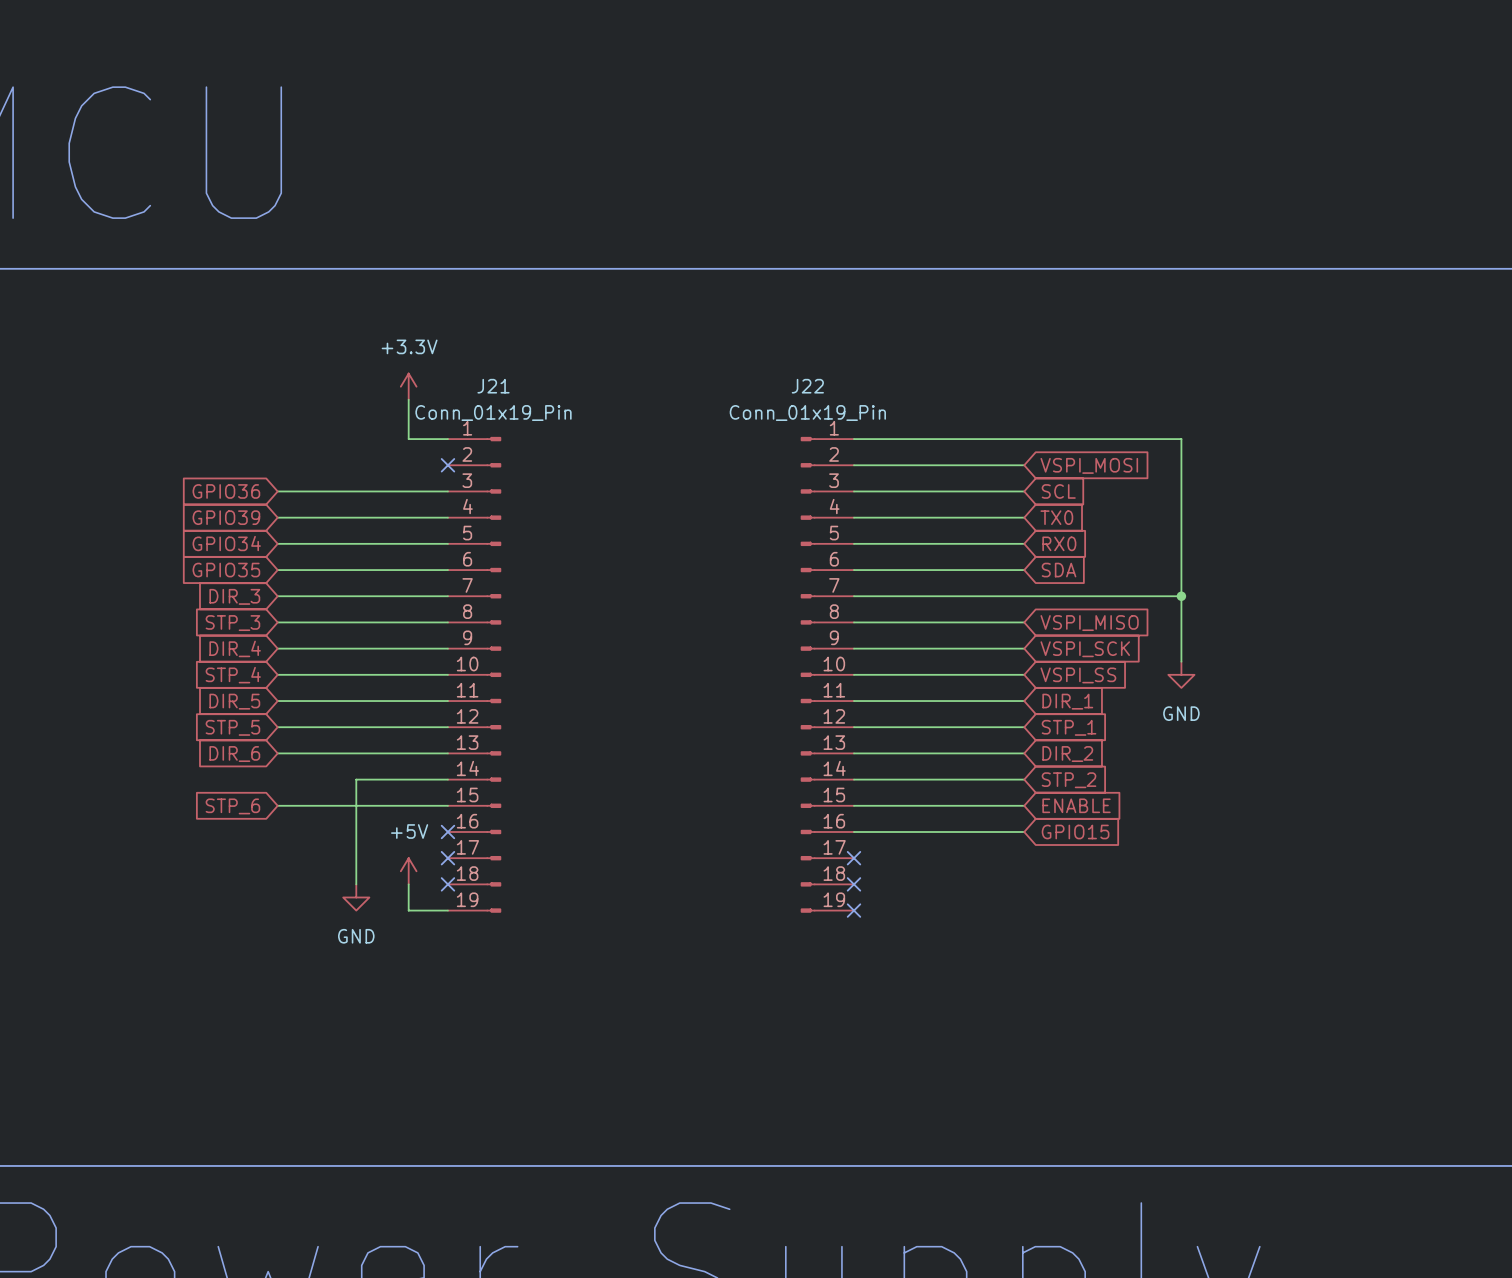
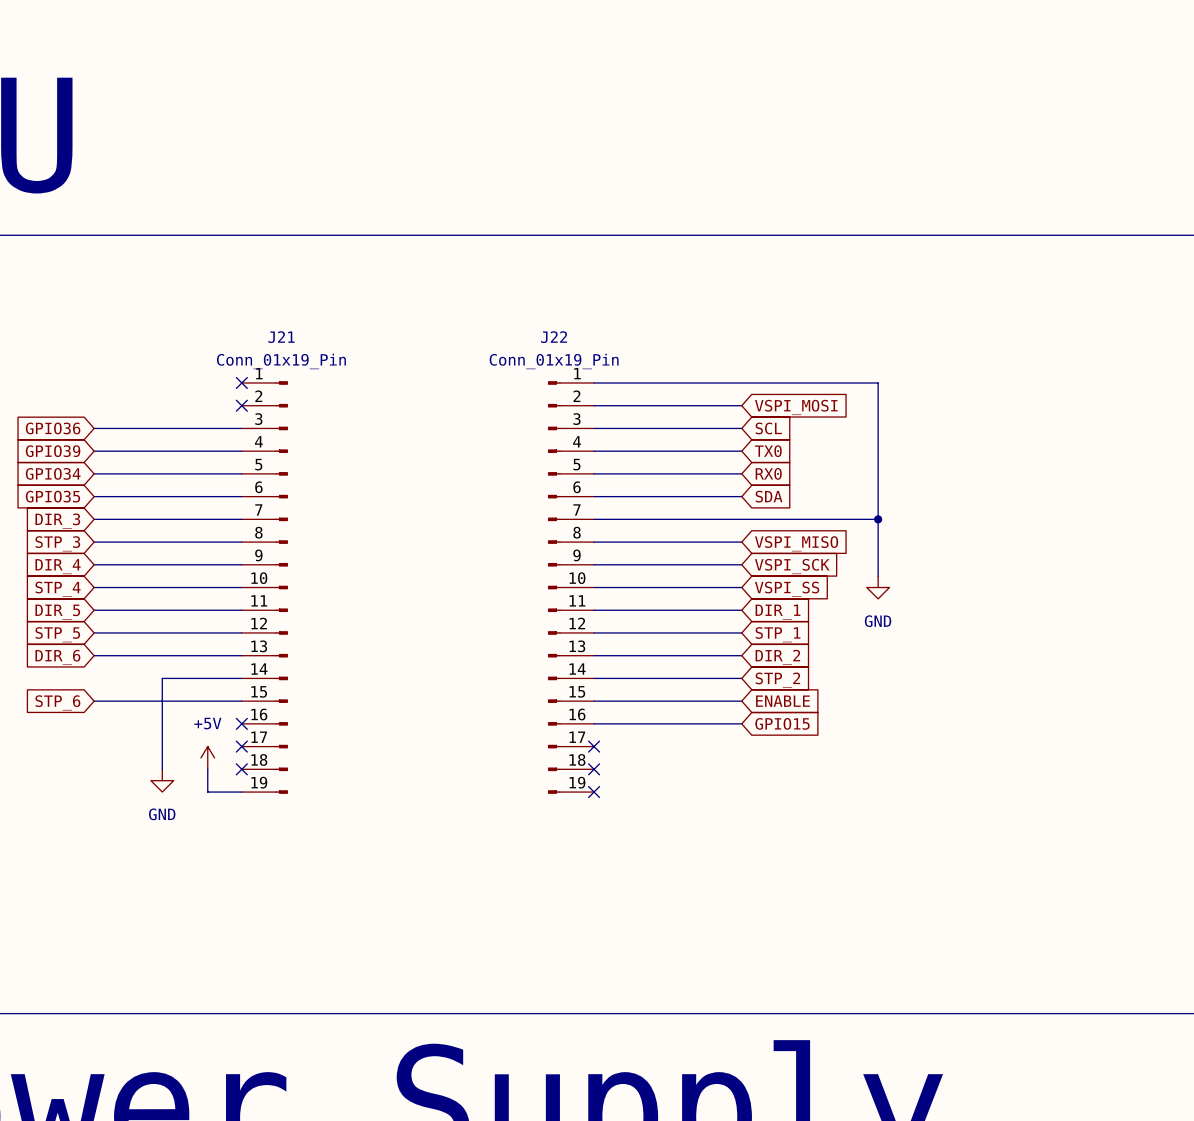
power symbol: +3.3V (408, 386) -> none
wire: (408, 399) (408, 439) (447, 439) -> none
no-connect mark: none -> (241, 383)

